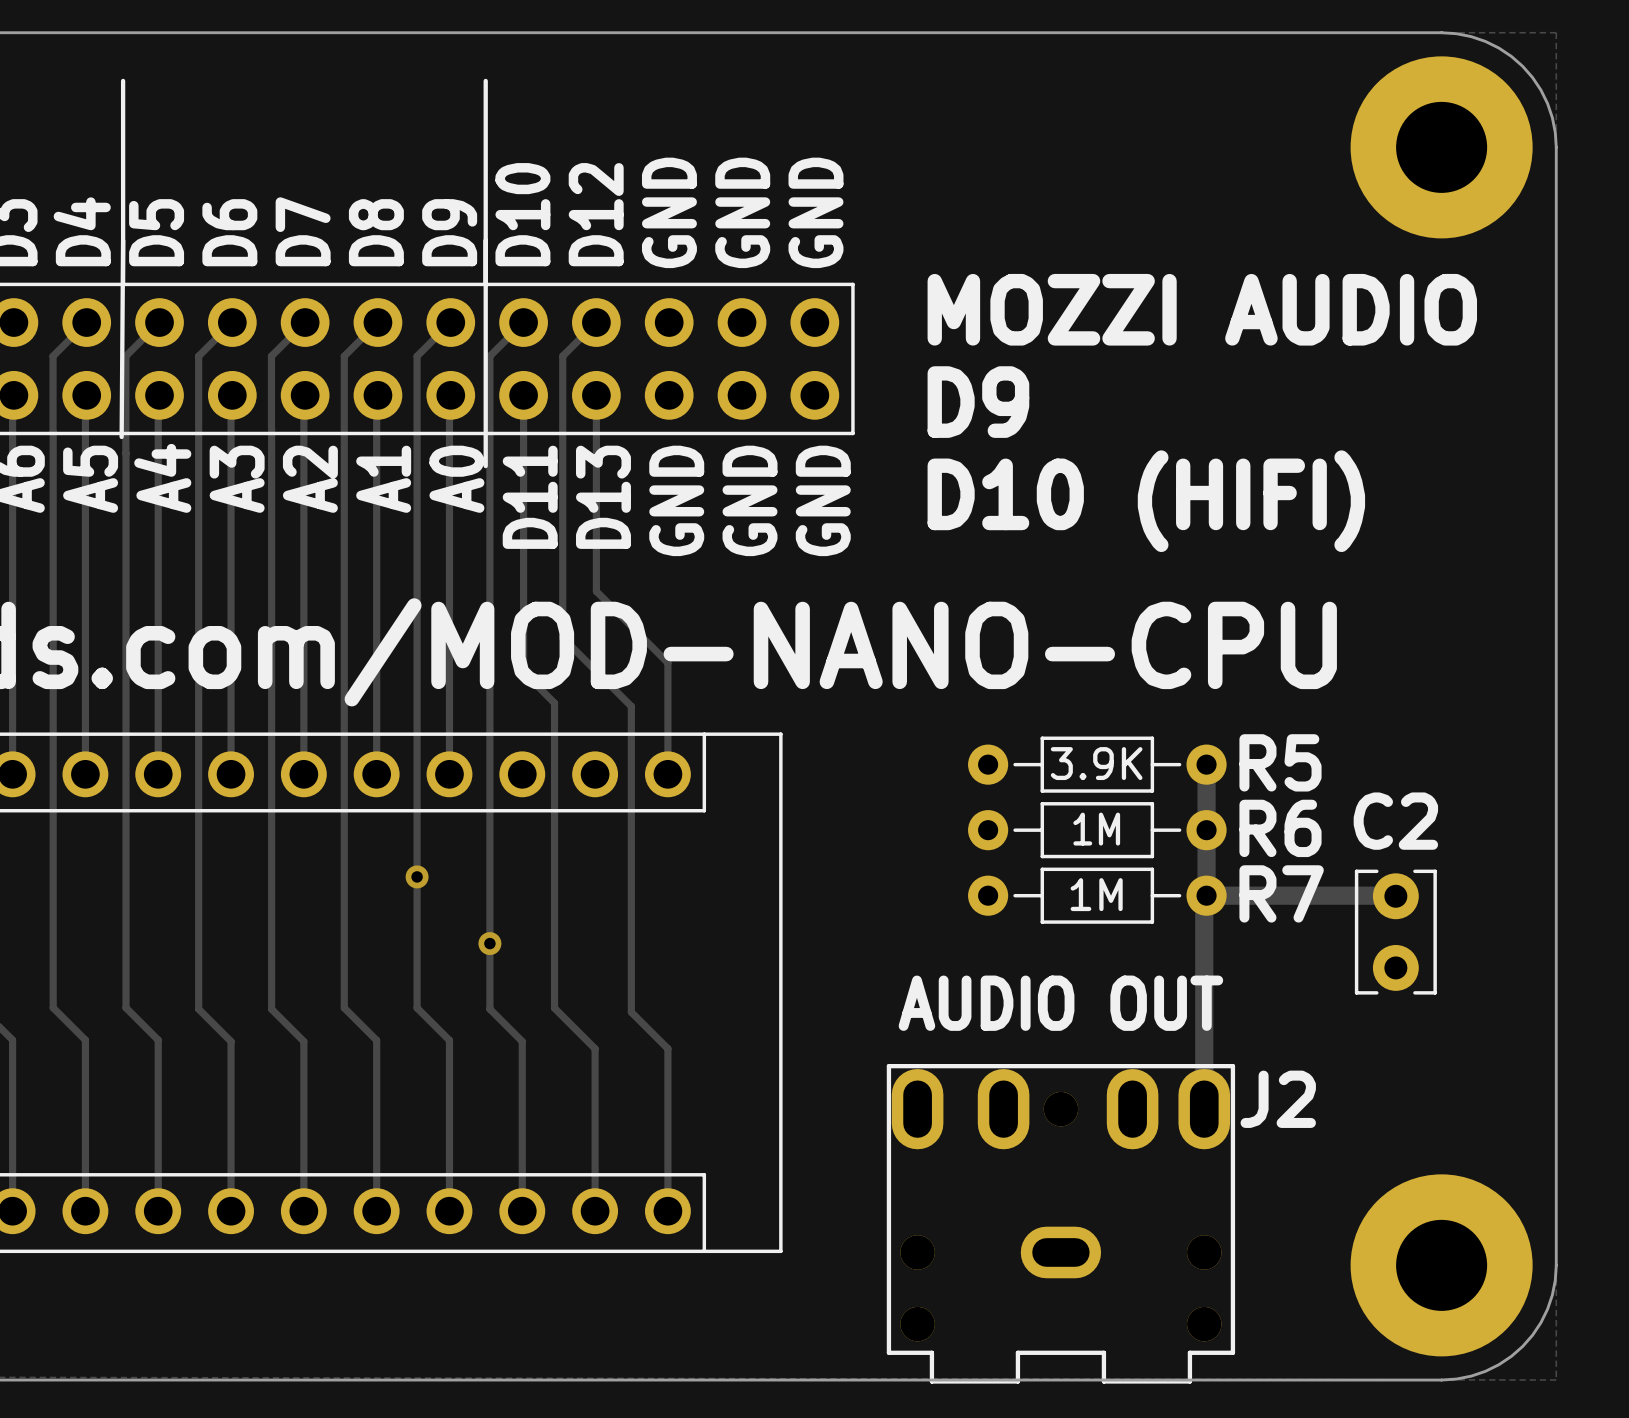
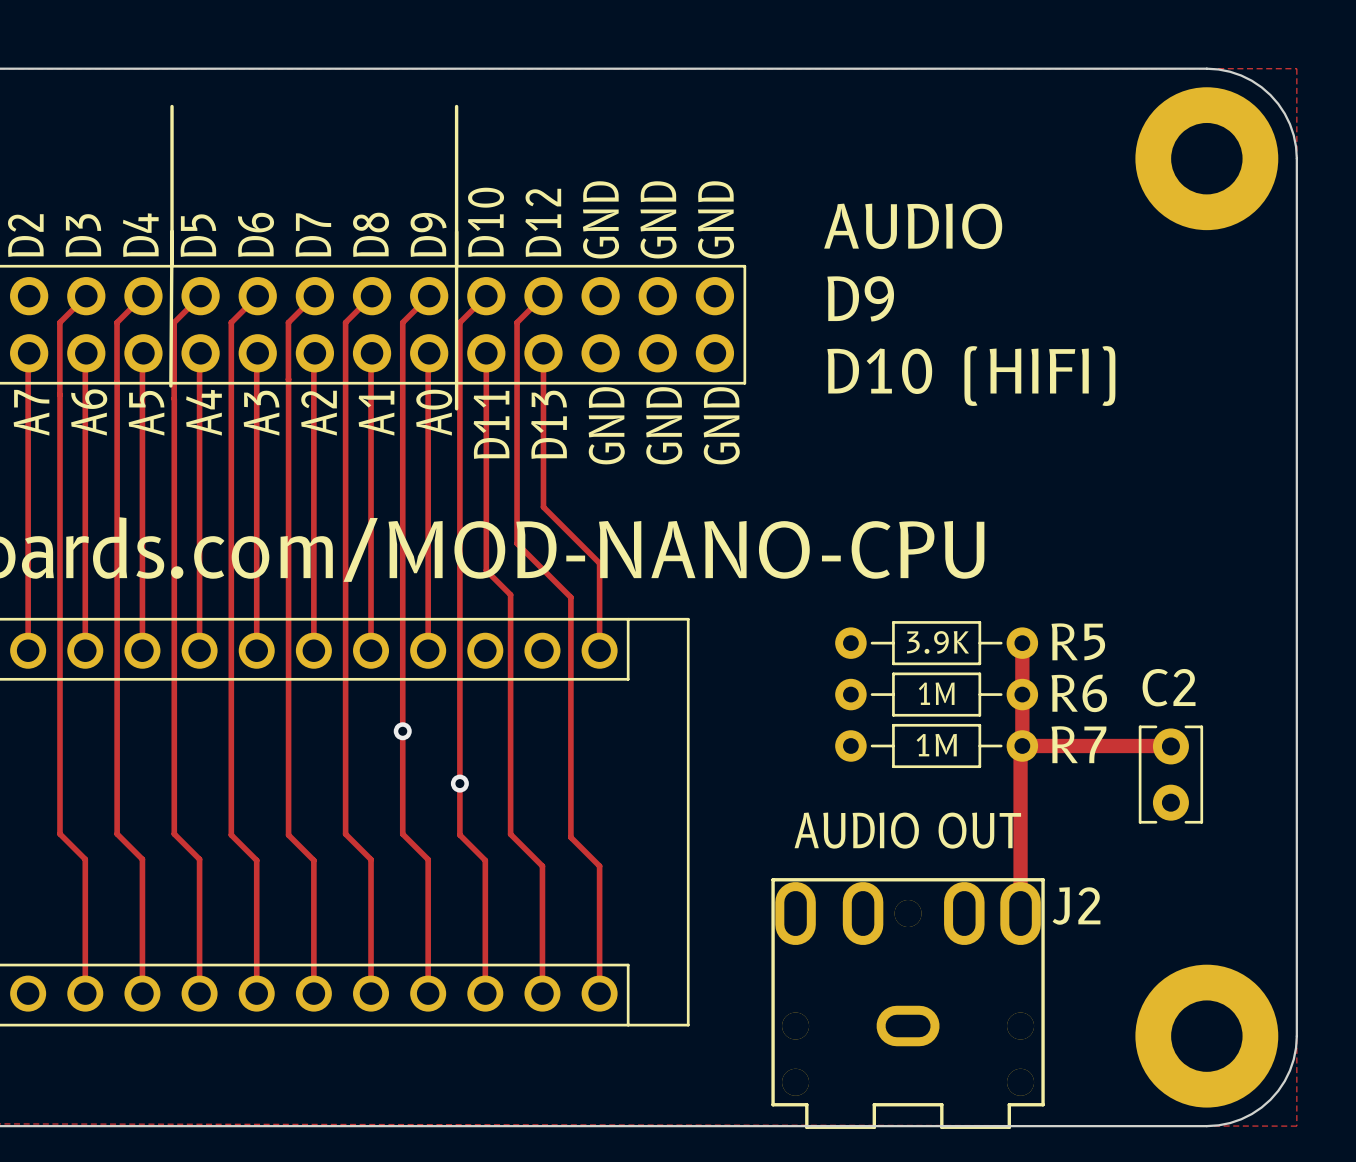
text: MOZZI AUDIO (1202, 309) -> AUDIO (913, 226)
text position: D9 (978, 402) -> D9 (860, 298)
text position: D10 (HIFI) (1146, 501) -> D10 (HIFI) (971, 376)

